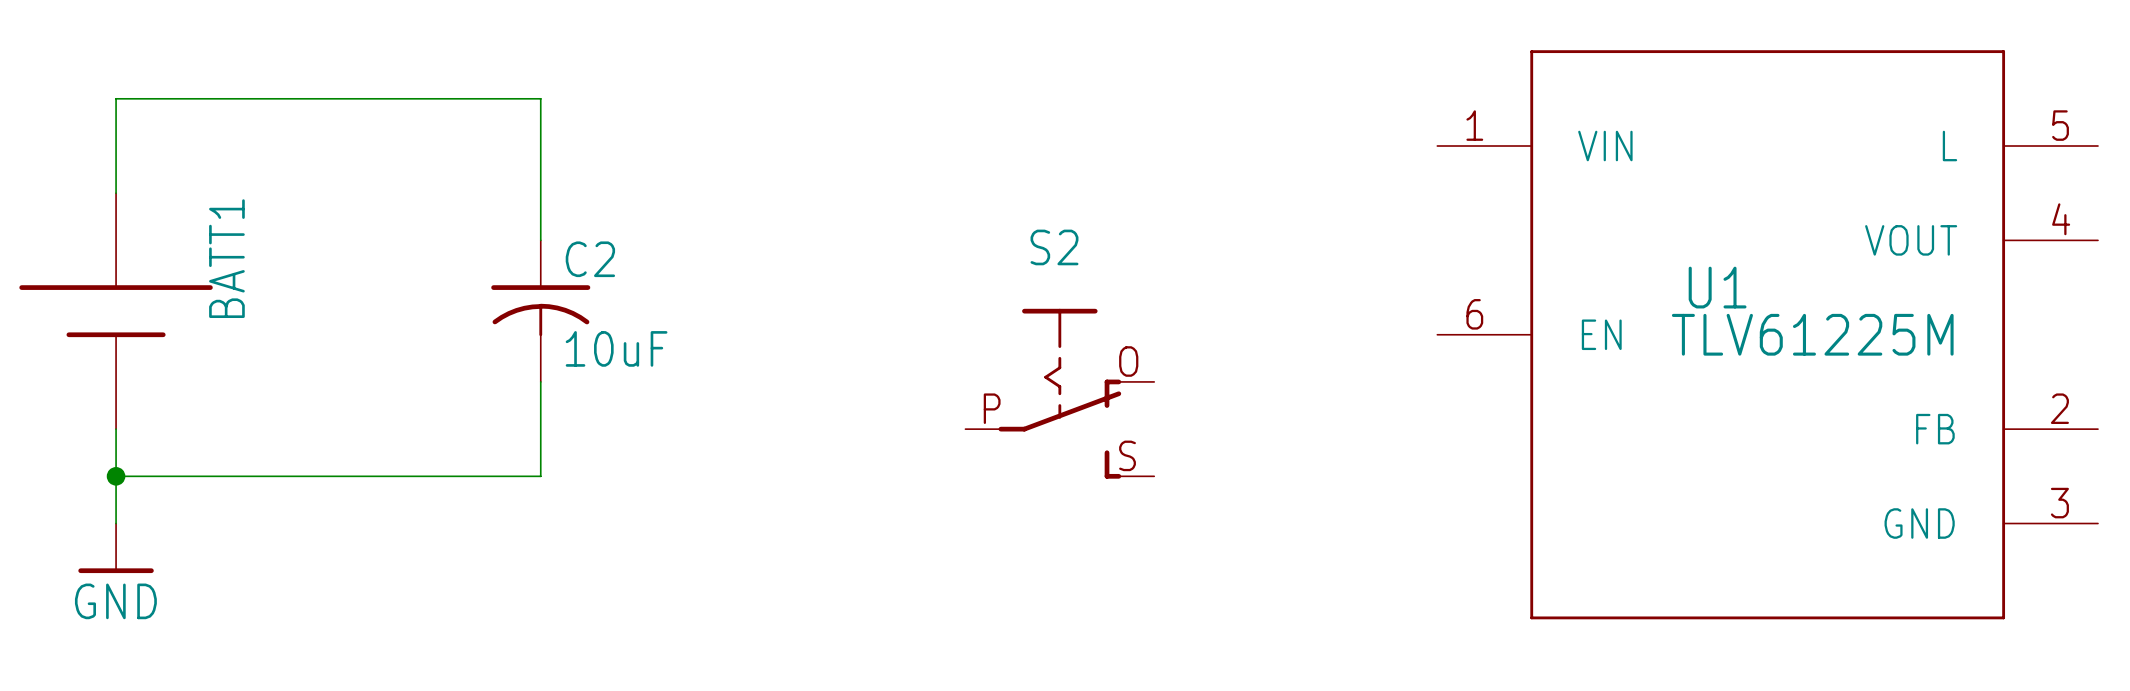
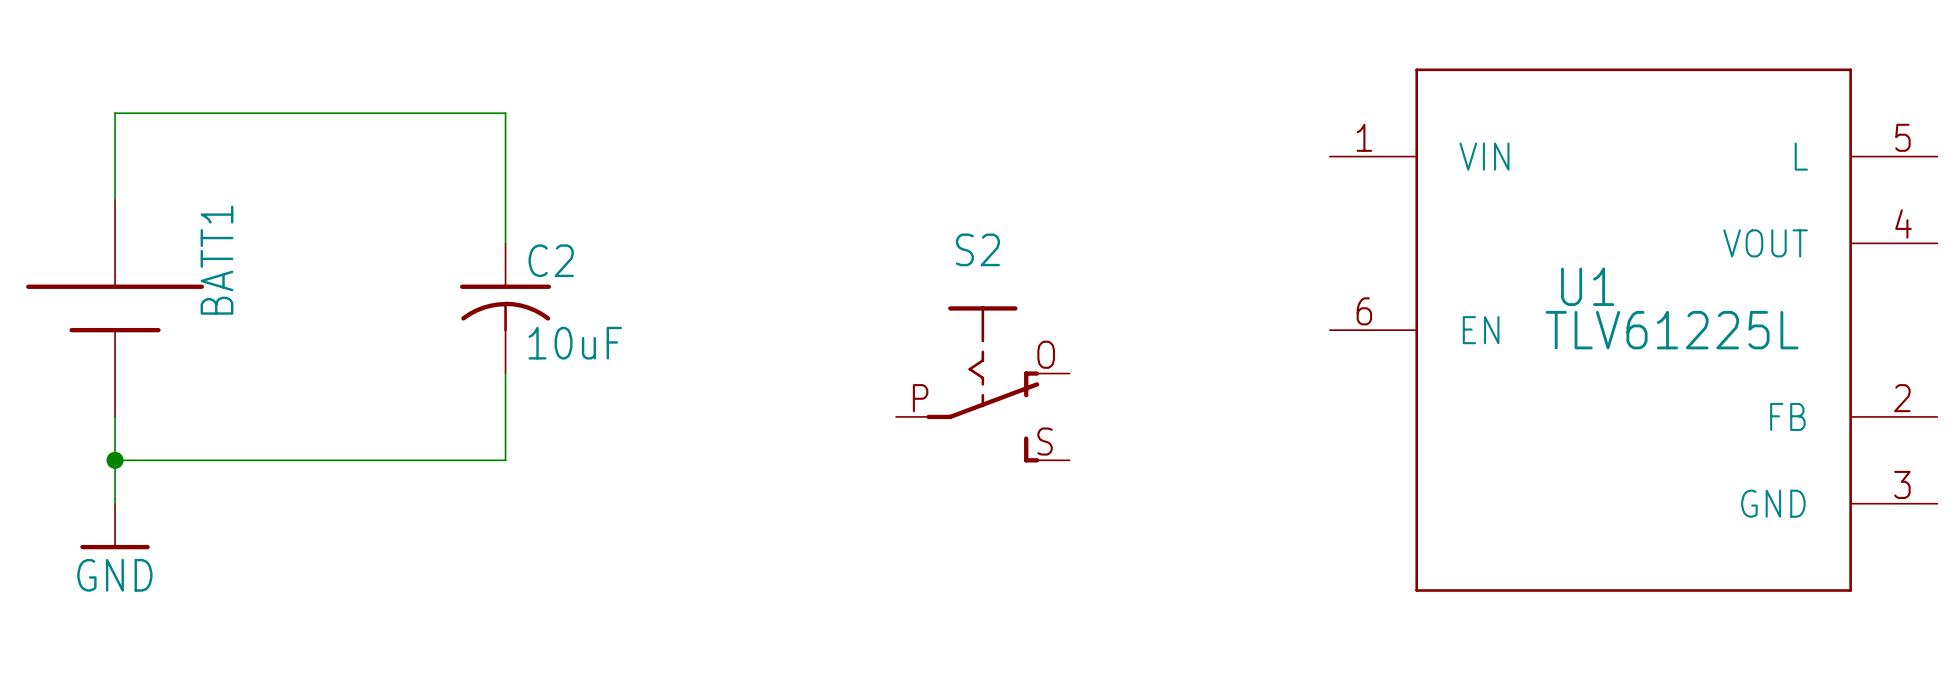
U1 value: TLV61225M (1812, 334) -> TLV61225L (1672, 330)

